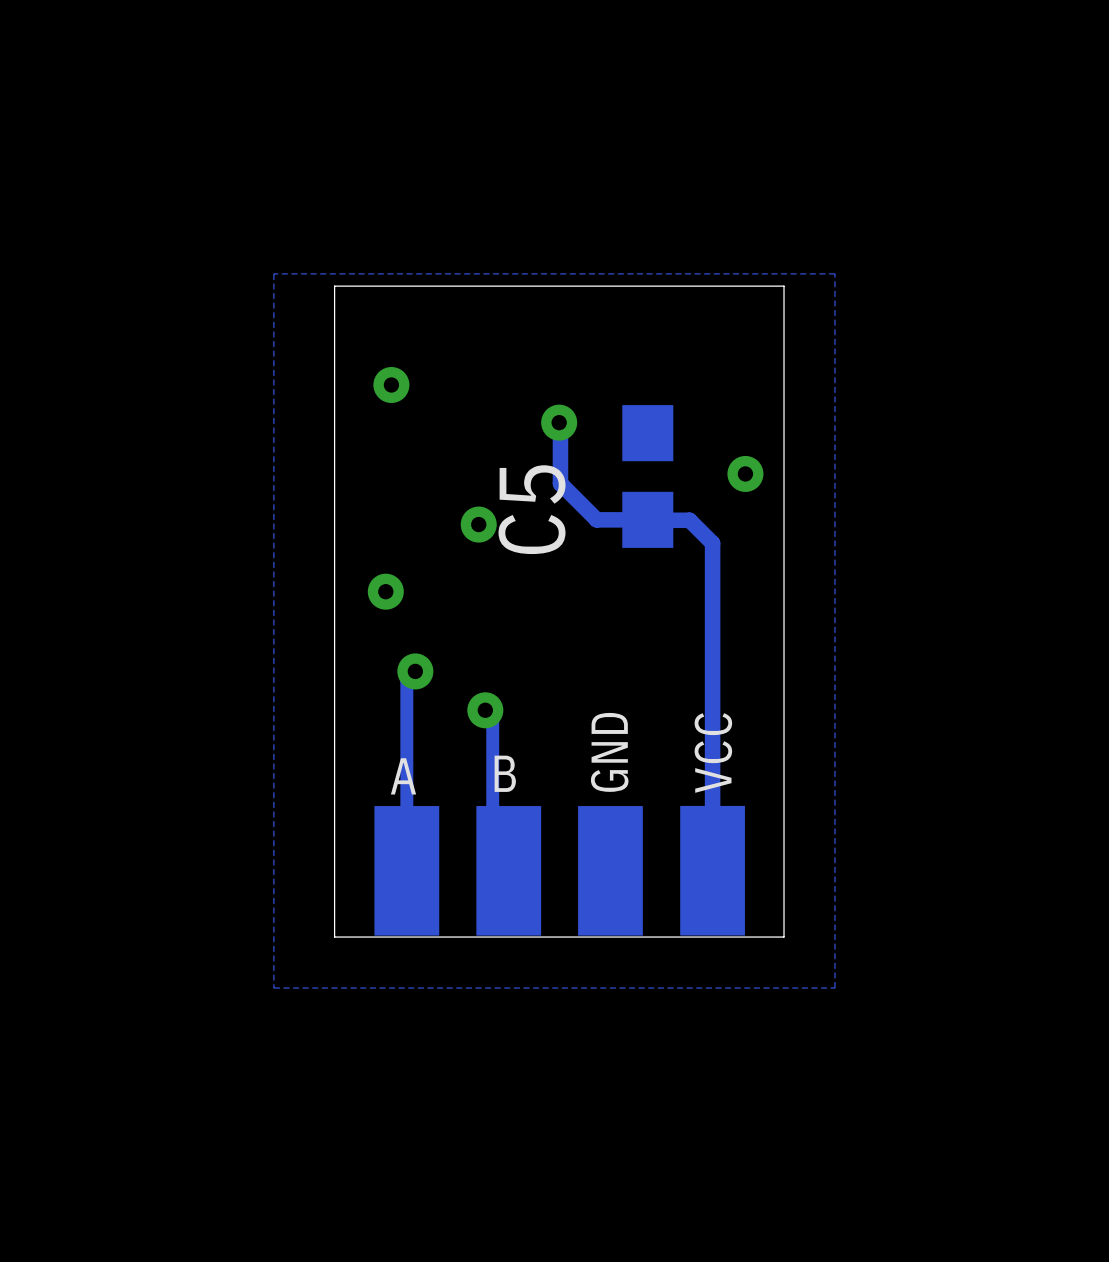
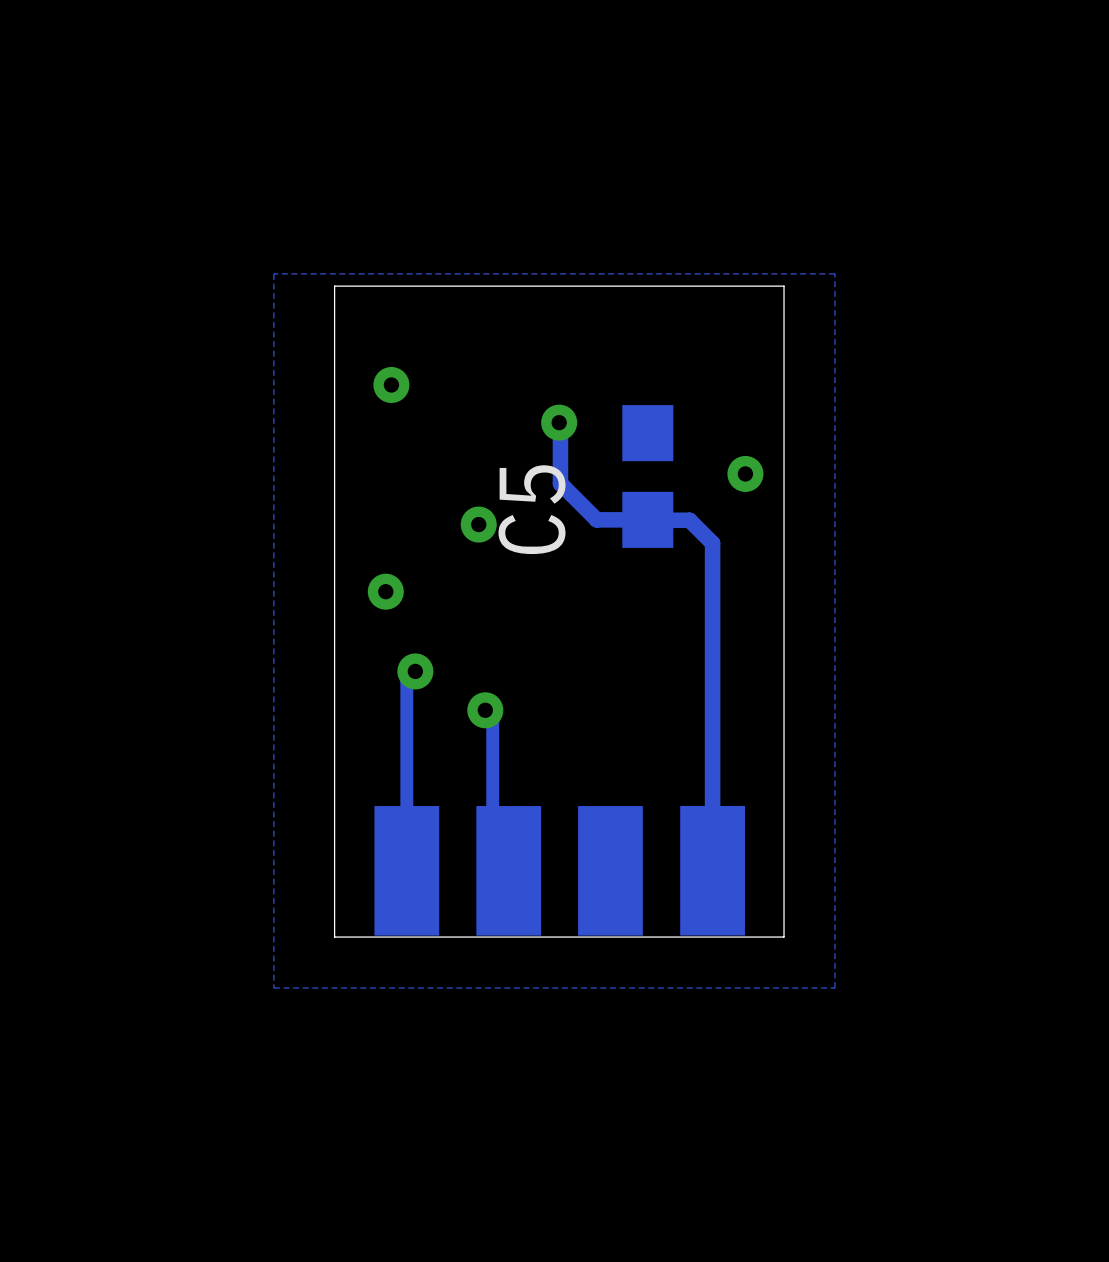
text: GND (609, 752) -> none
text: VCC (713, 753) -> none
text: B (505, 773) -> none
text: A (403, 776) -> none

